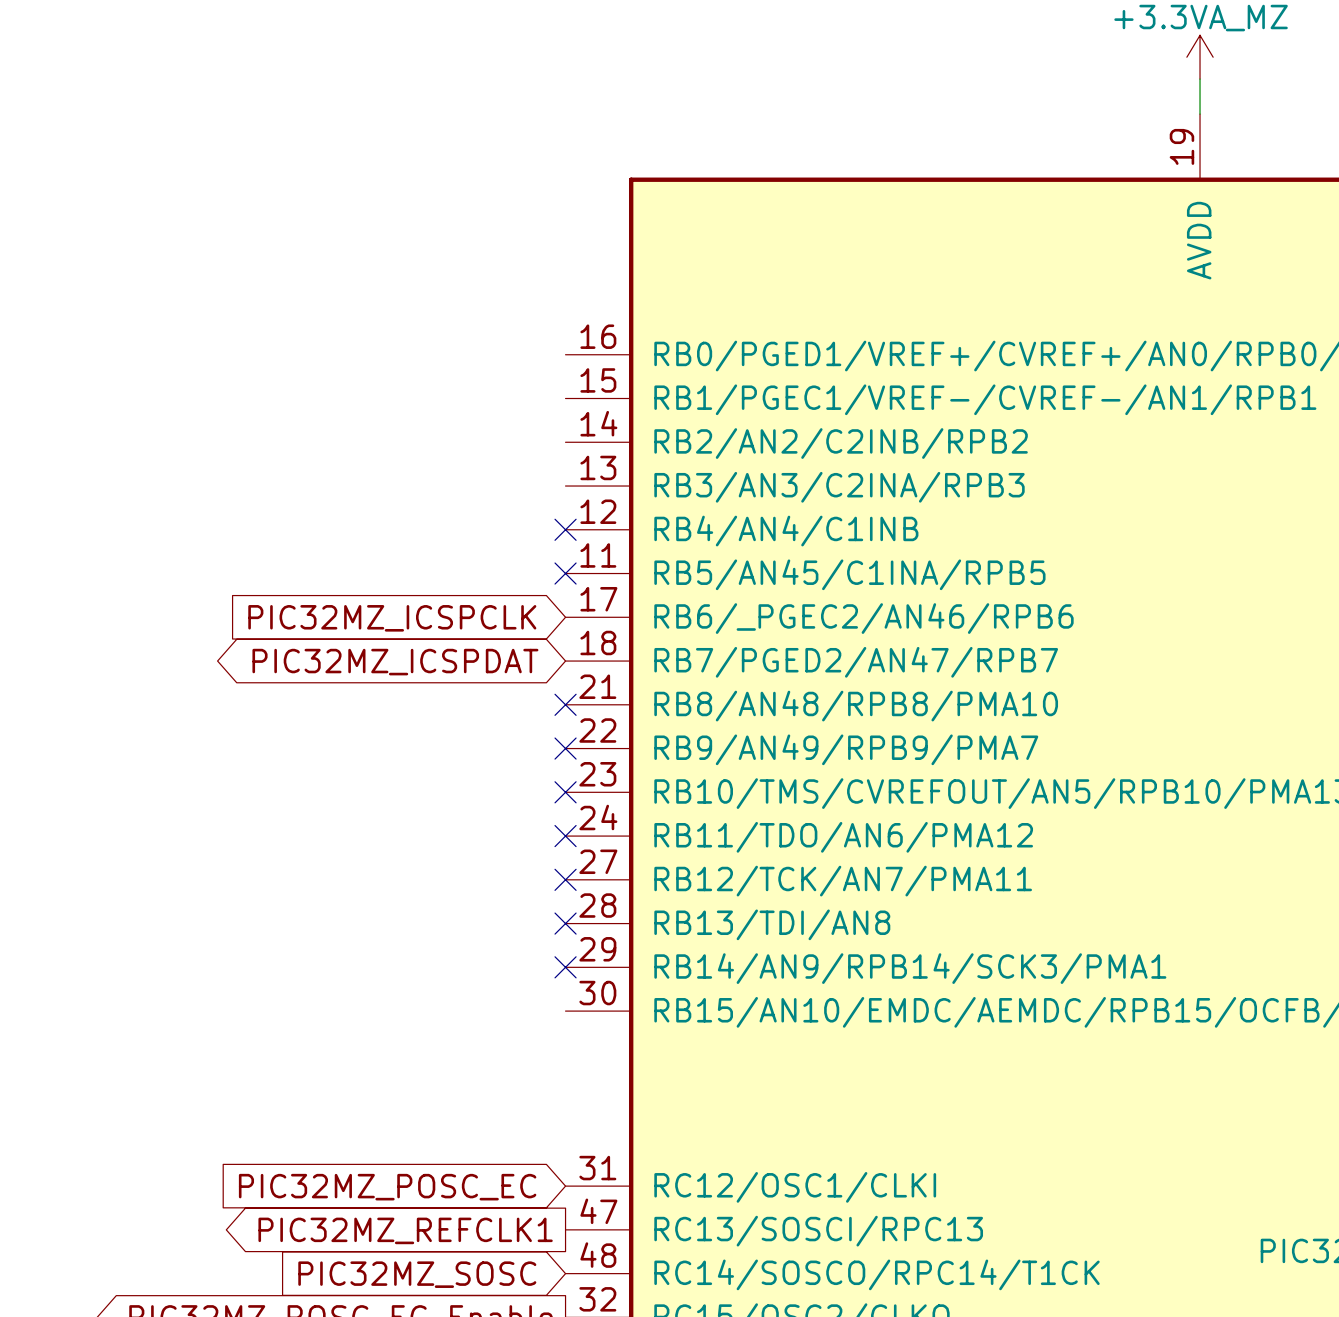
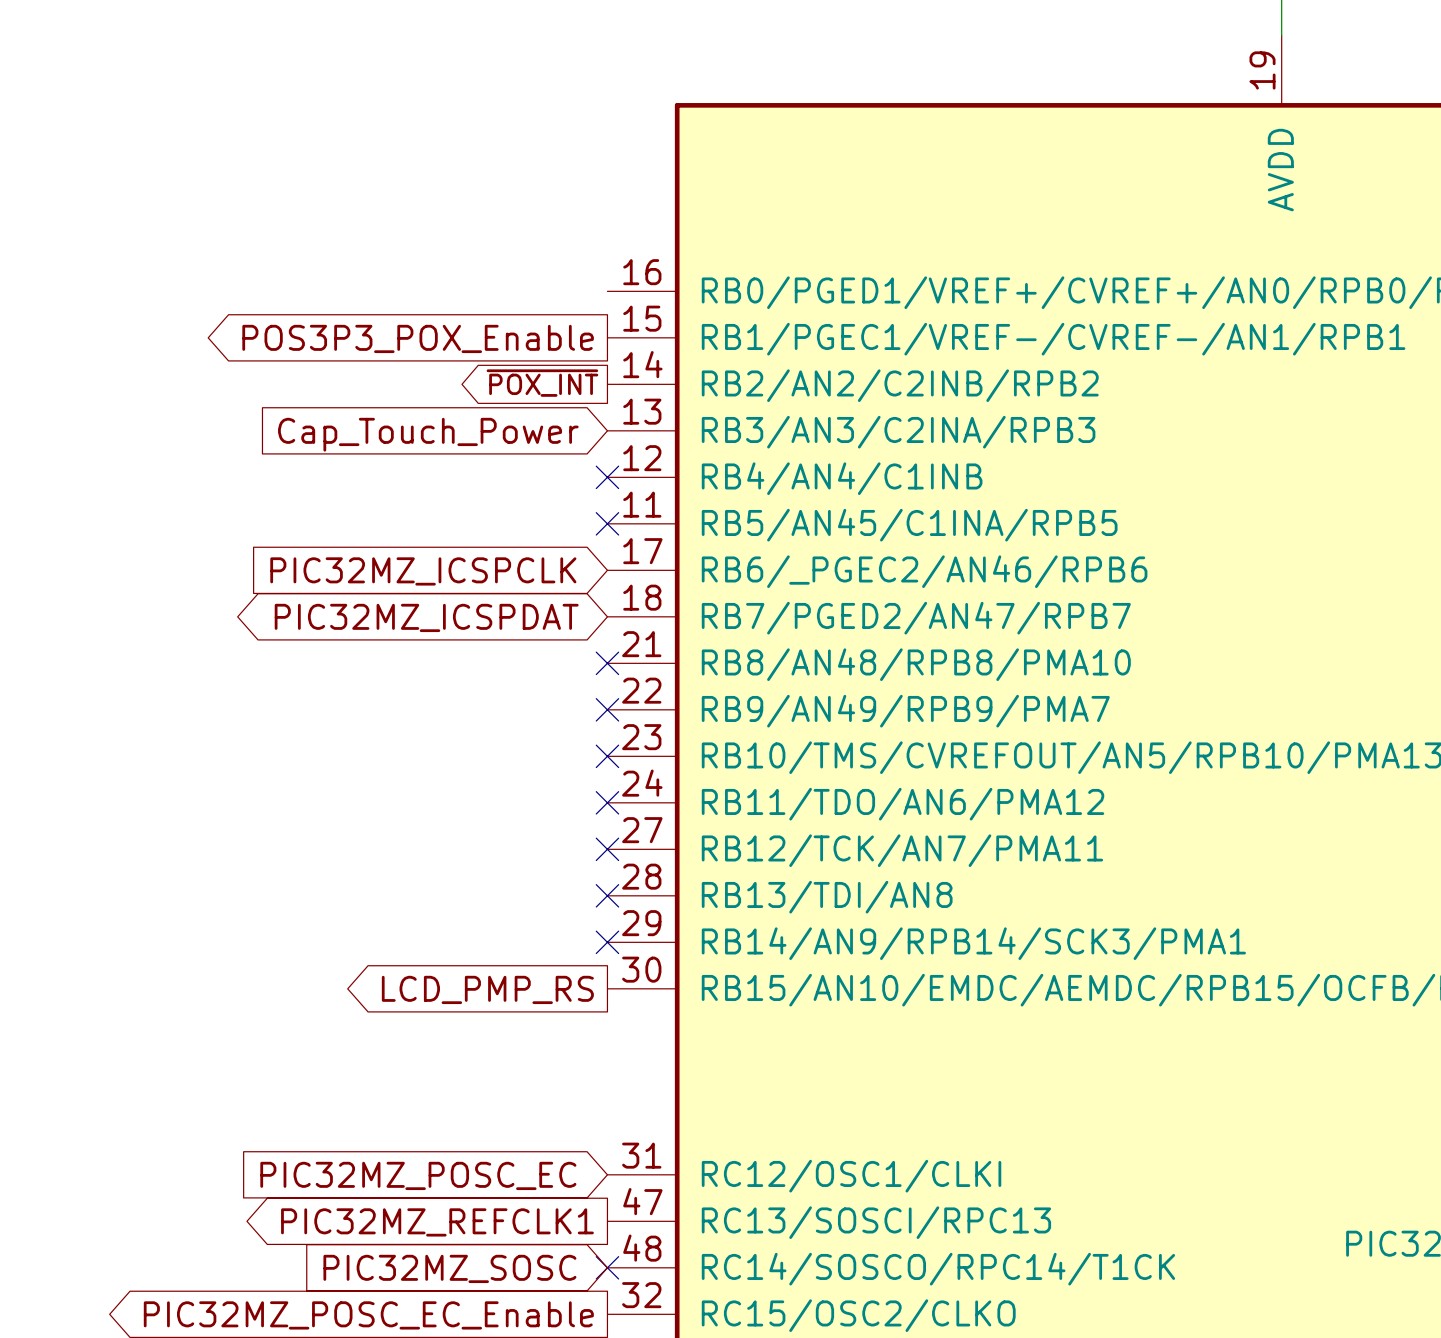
global label: none -> POS3P3_POX_Enable (418, 338)
global label: none -> ~{POX_INT} (542, 383)
global label: none -> Cap_Touch_Power (428, 434)
global label: none -> LCD_PMP_RS (487, 989)
no-connect mark: none -> (607, 1267)

